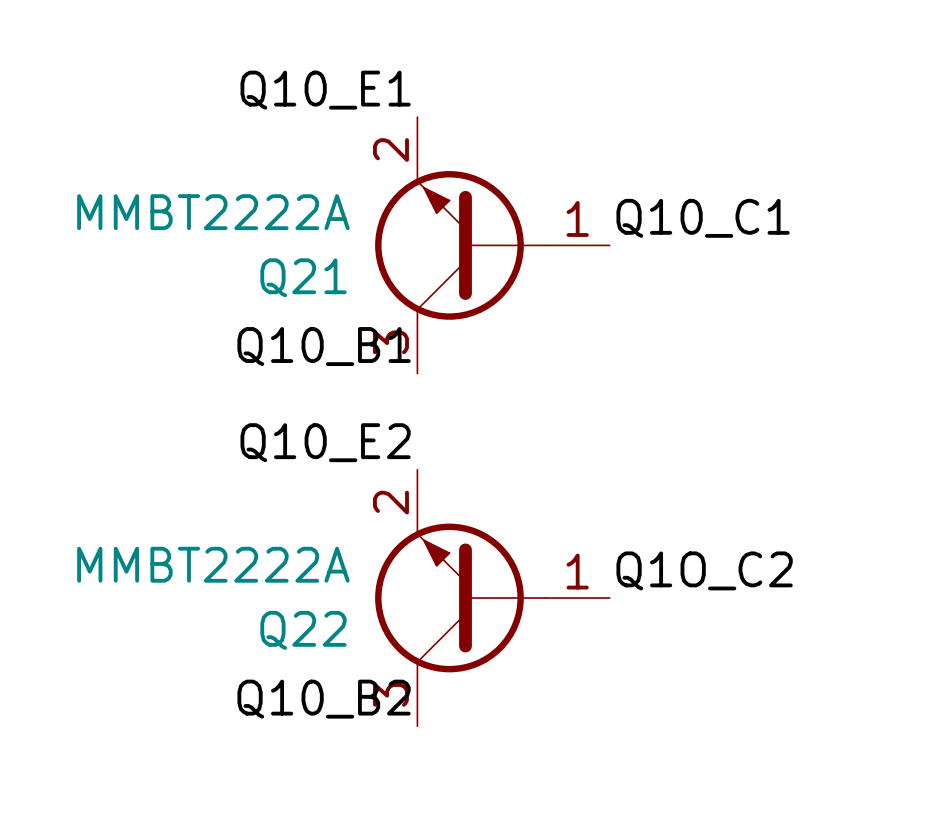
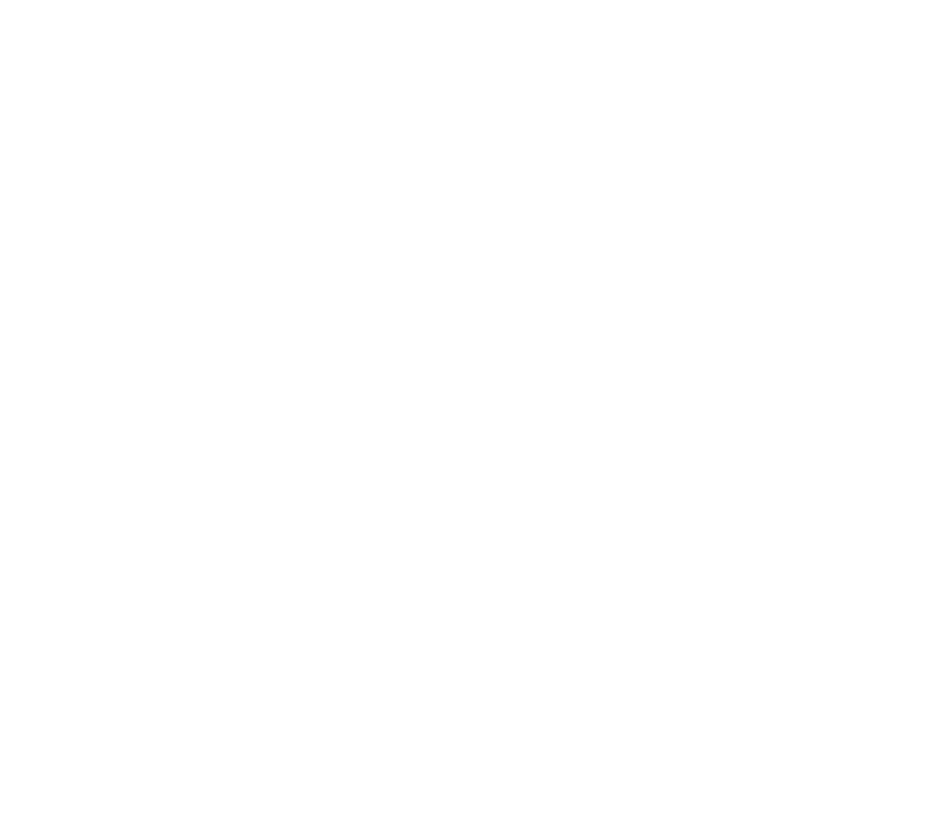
label: Q10_E1 (325, 90) -> none
label: Q10_C1 (703, 218) -> none
Q21: MMBT2222A (492, 245) -> none
label: Q10_B1 (324, 346) -> none
label: Q10_E2 (325, 442) -> none
label: Q1O_C2 (704, 570) -> none
Q22: MMBT2222A (492, 597) -> none
label: Q10_B2 (324, 699) -> none

